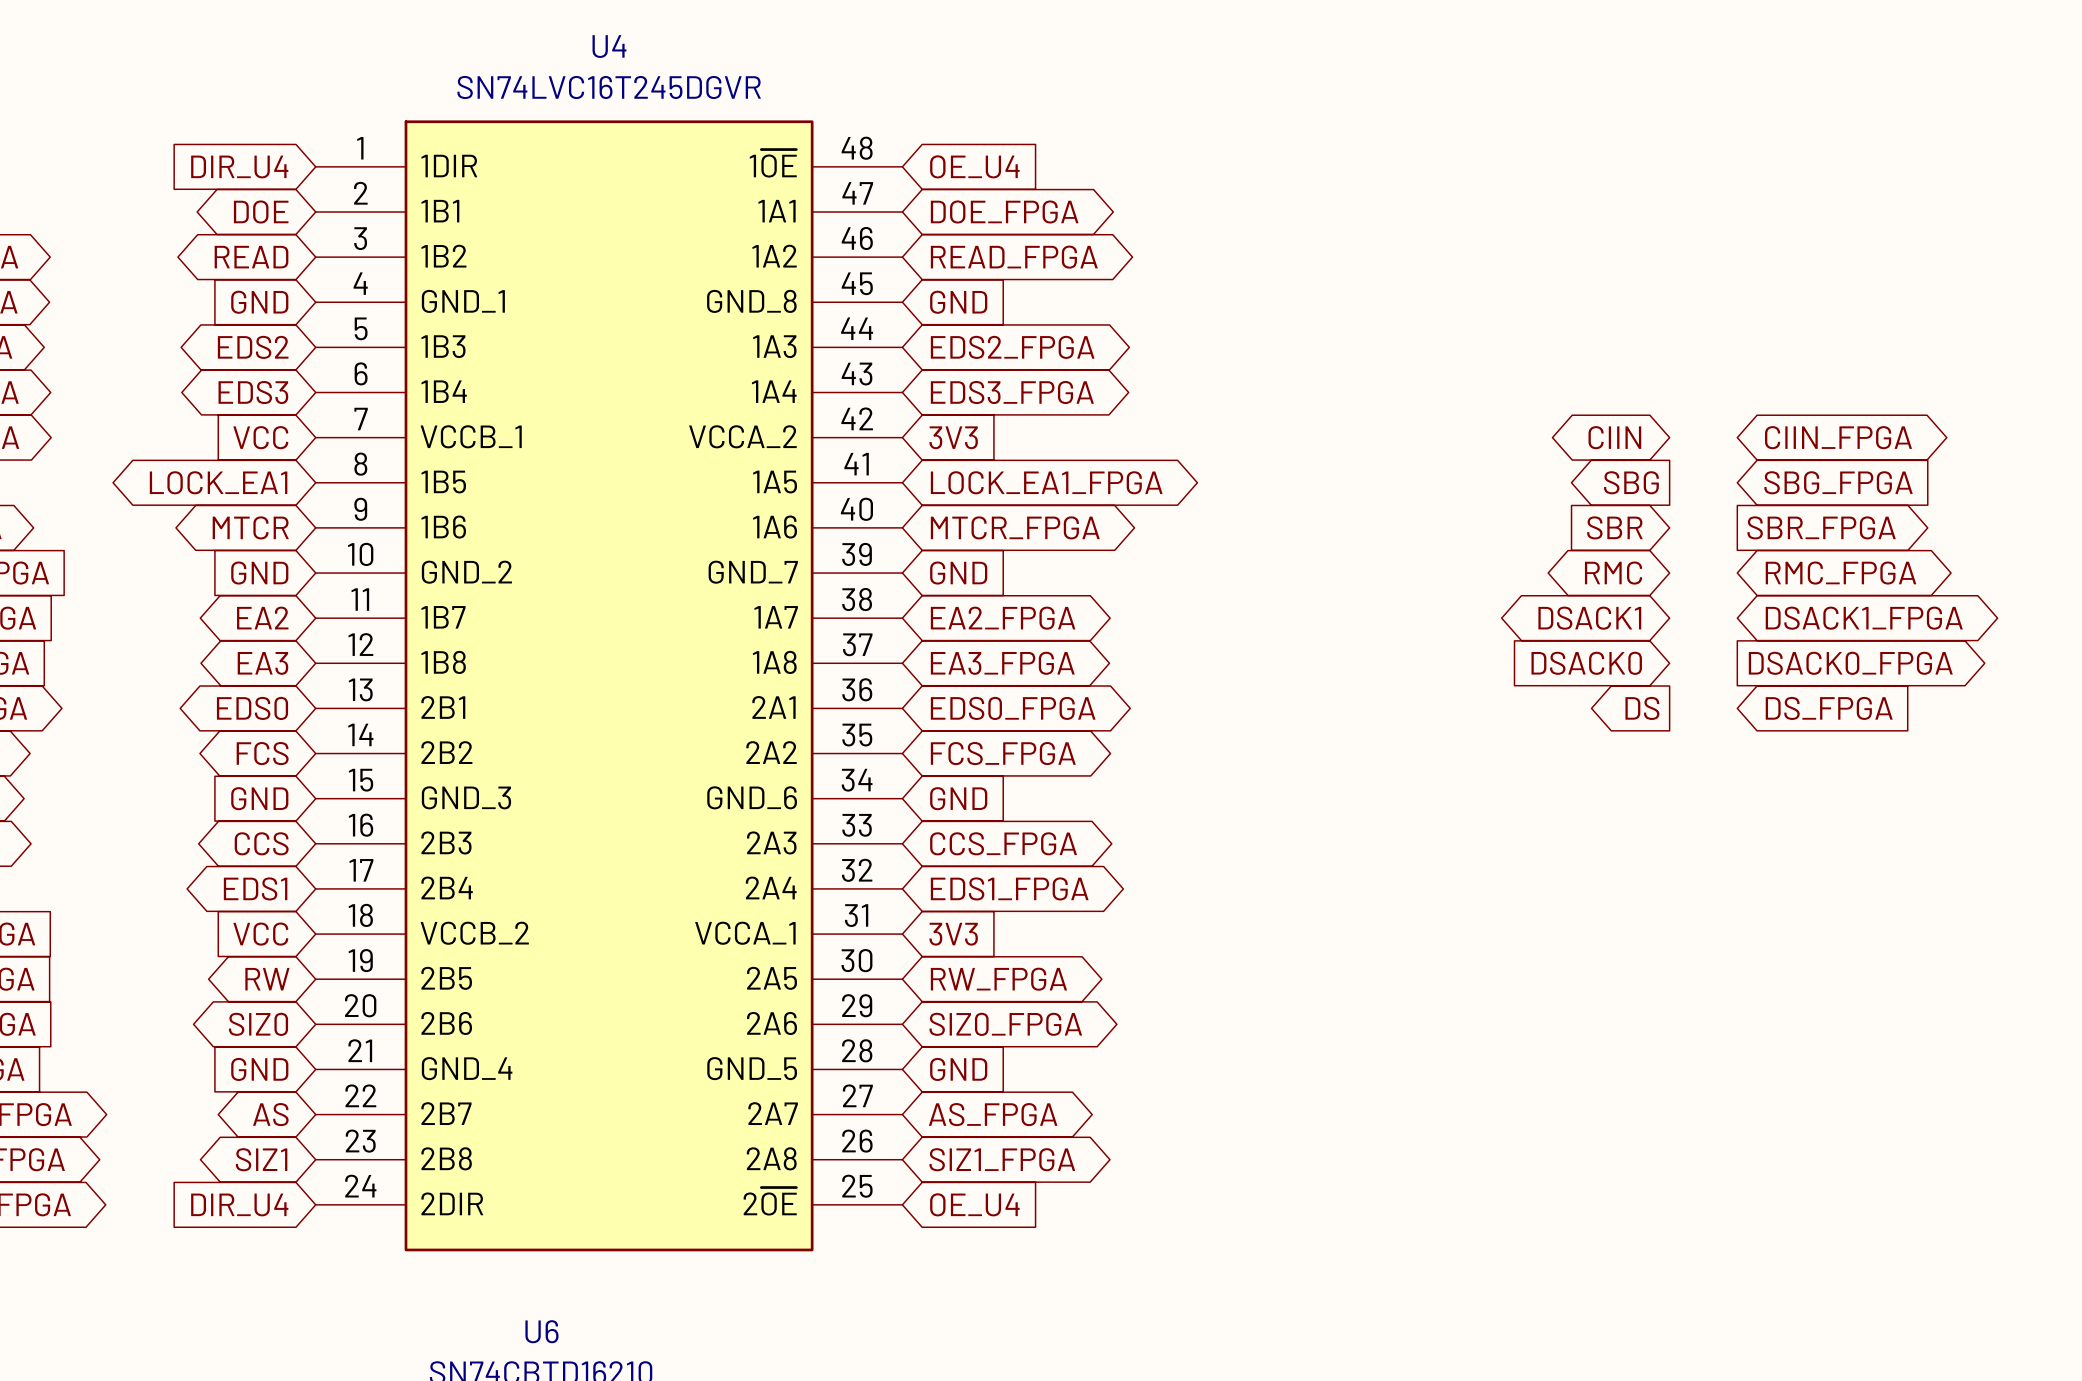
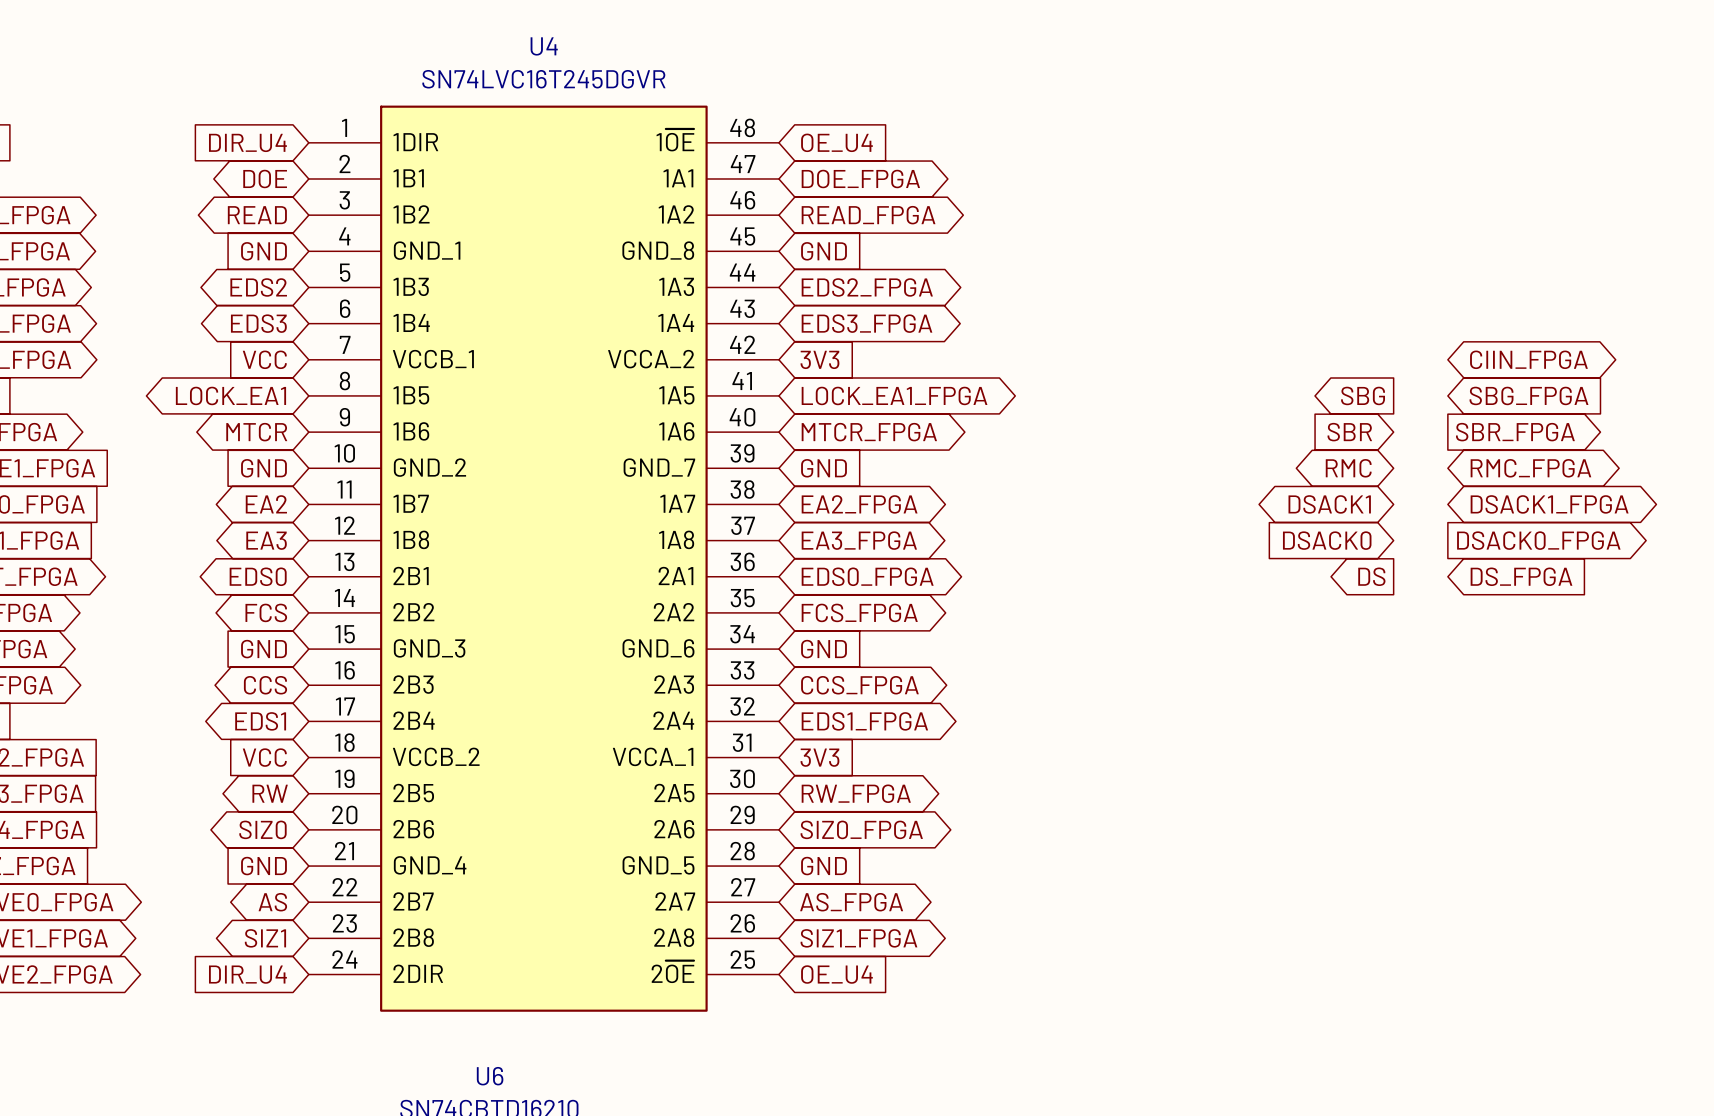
global label: CIIN (1614, 437) -> none

